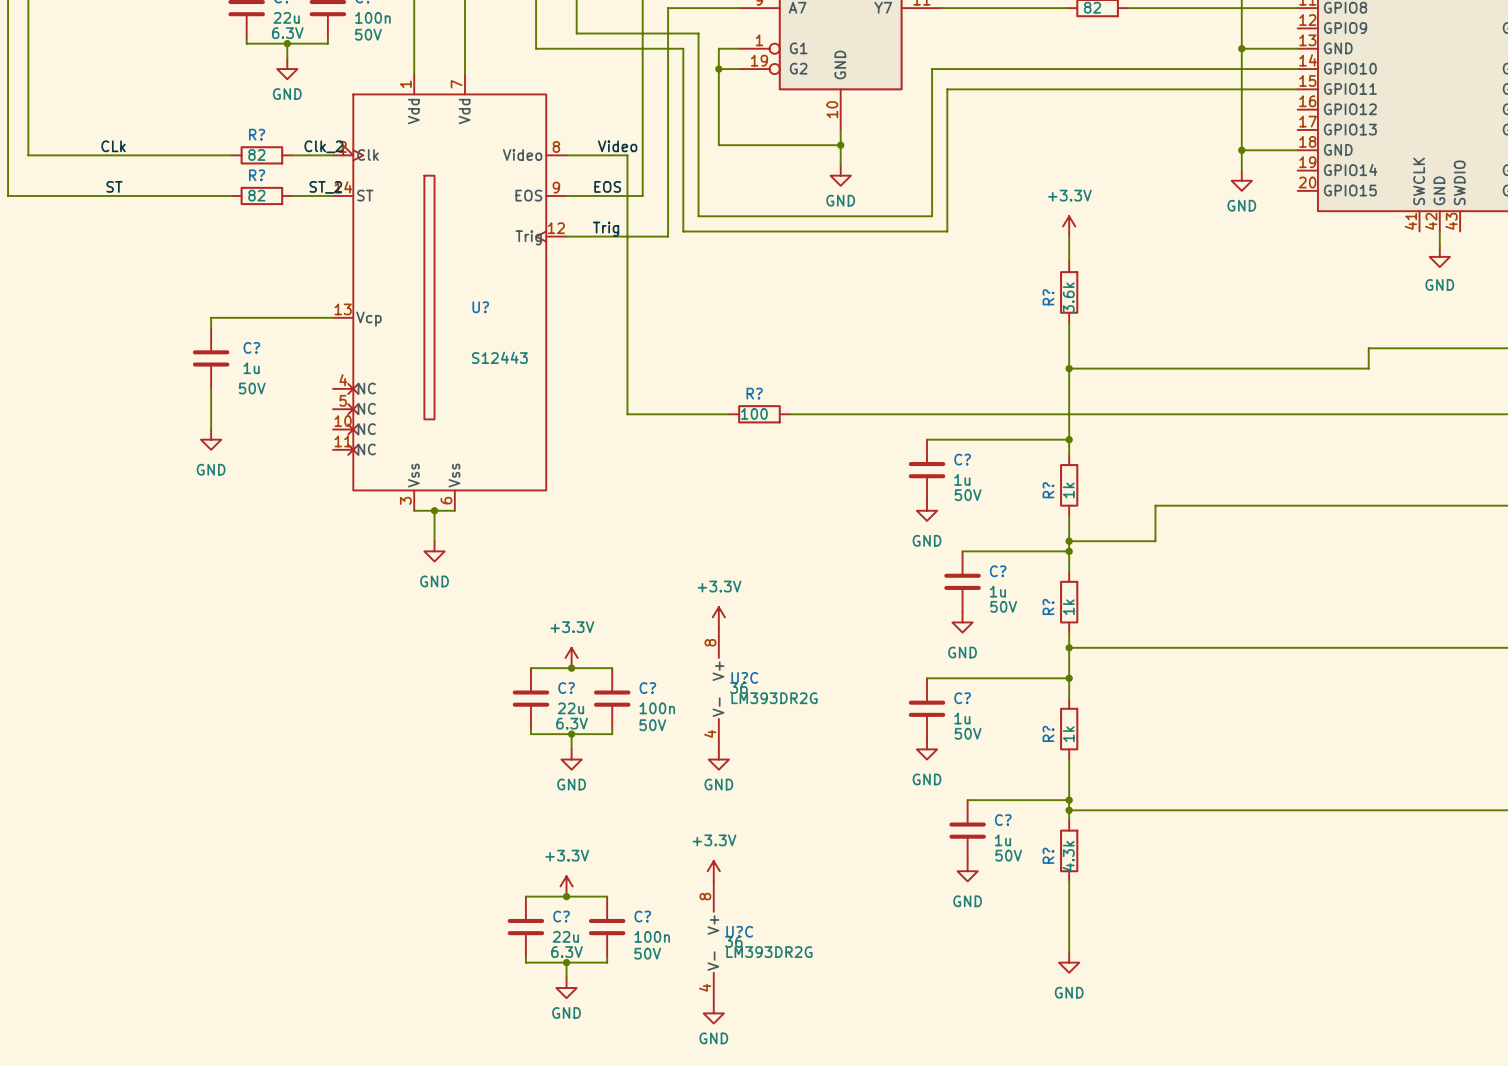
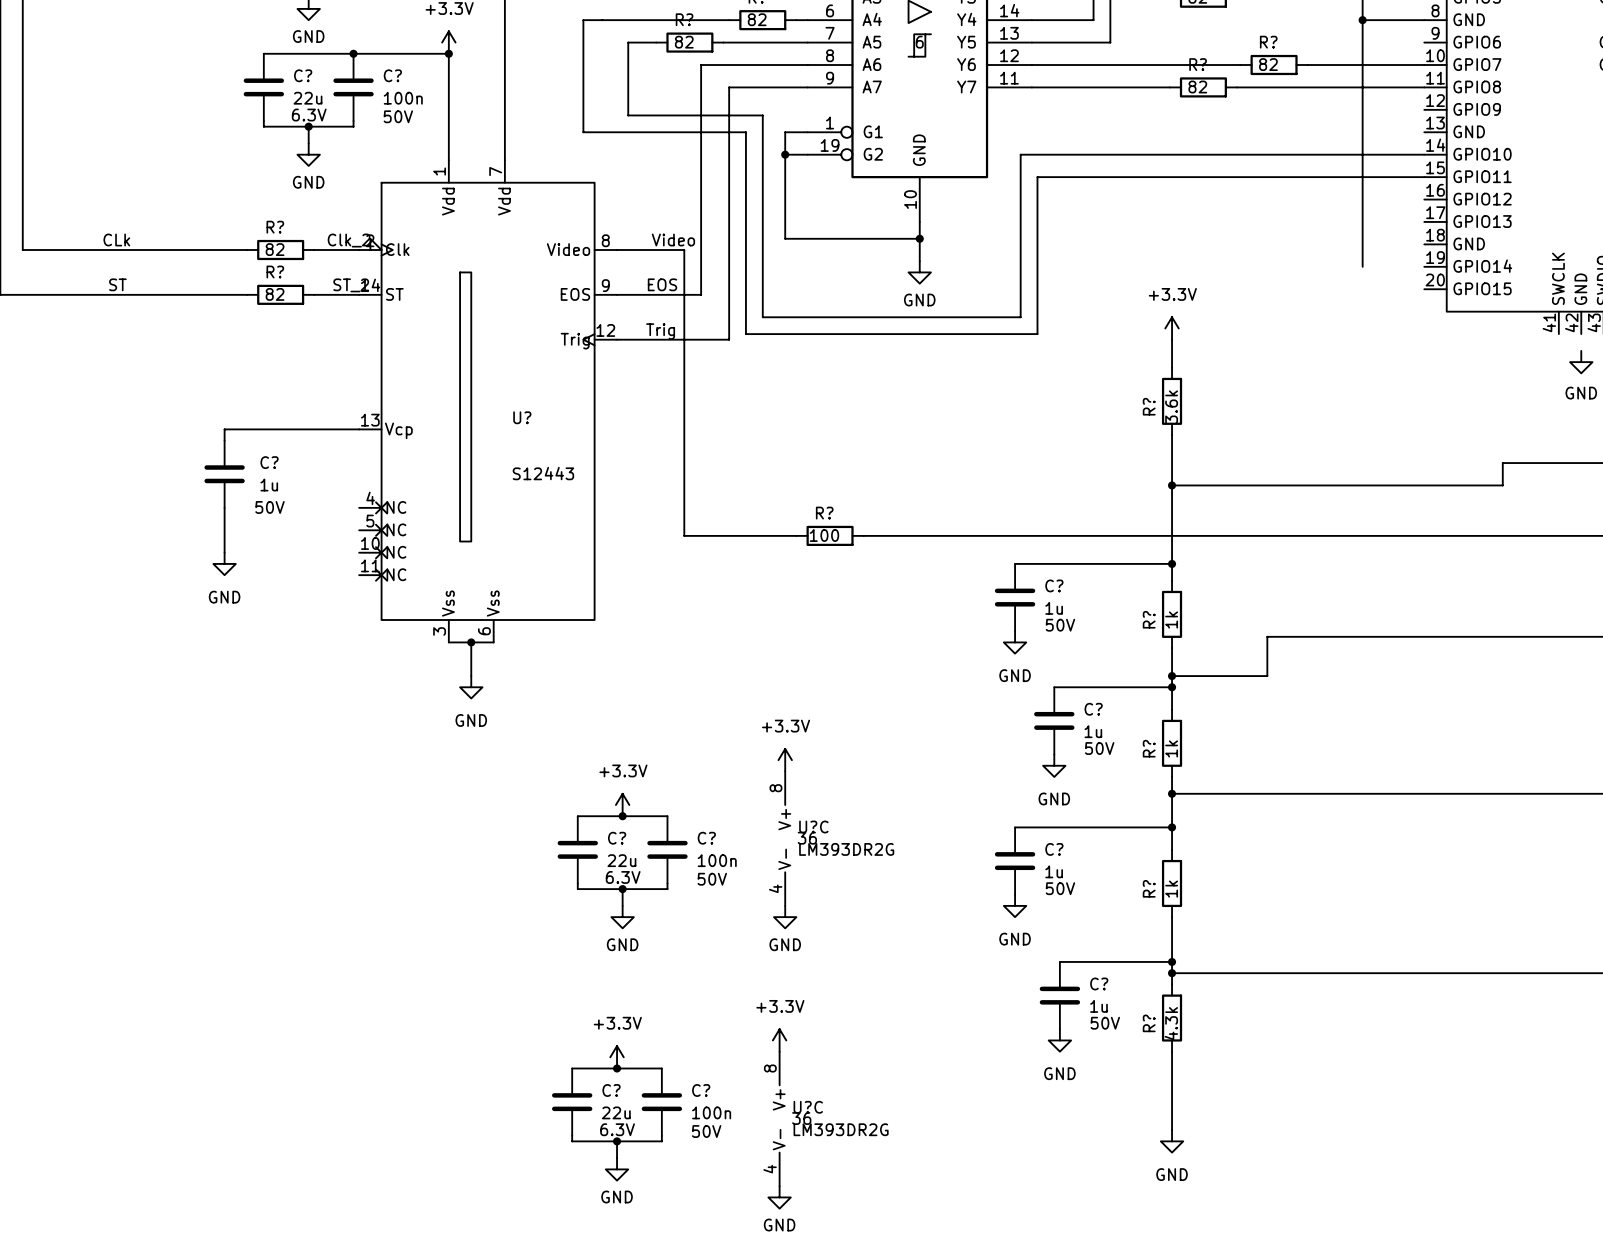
wire: (1241, 48) (1297, 48) -> none
junction: (1241, 48) -> none
wire: (1241, 150) (1297, 150) -> none
junction: (1241, 150) -> none
power symbol: GND (1241, 180) -> none
wire: (1439, 231) (1439, 246) -> none

